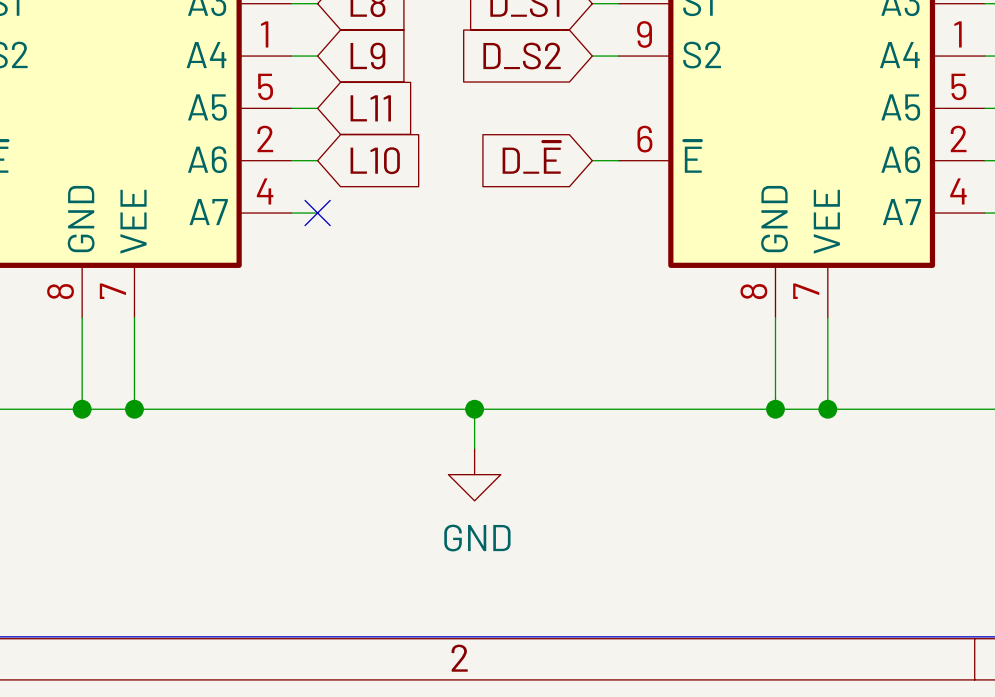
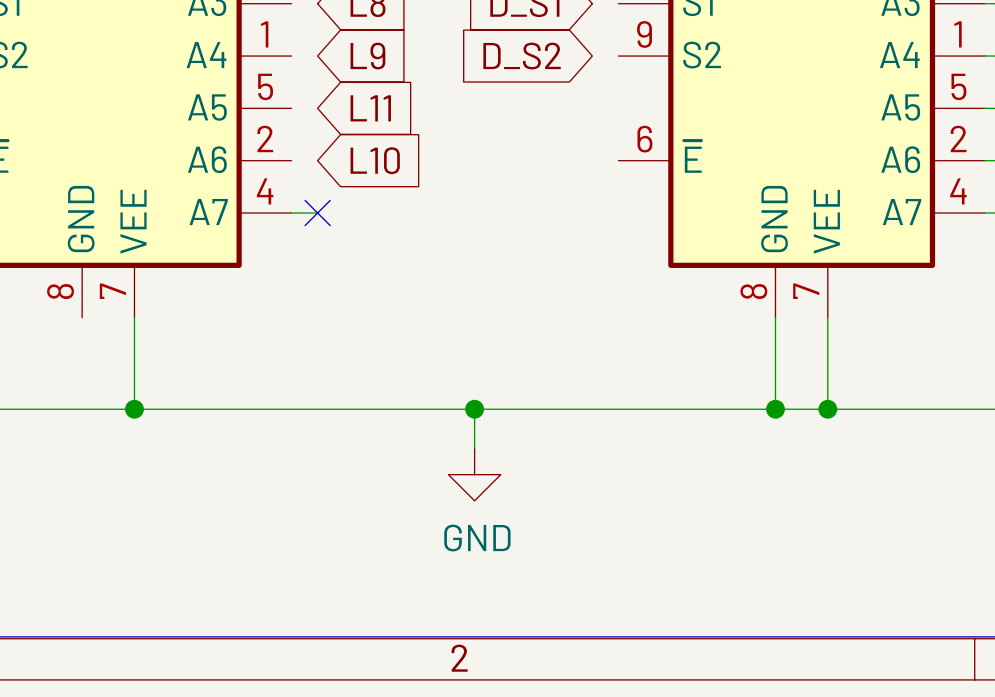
wire: (291, 3) (317, 3) -> none
wire: (592, 3) (618, 3) -> none
wire: (291, 56) (317, 56) -> none
wire: (592, 56) (618, 56) -> none
wire: (291, 108) (317, 108) -> none
global label: D_~{E} (531, 157) -> none
wire: (291, 160) (317, 160) -> none
wire: (592, 160) (618, 160) -> none
wire: (82, 317) (82, 409) -> none
junction: (82, 409) -> none

